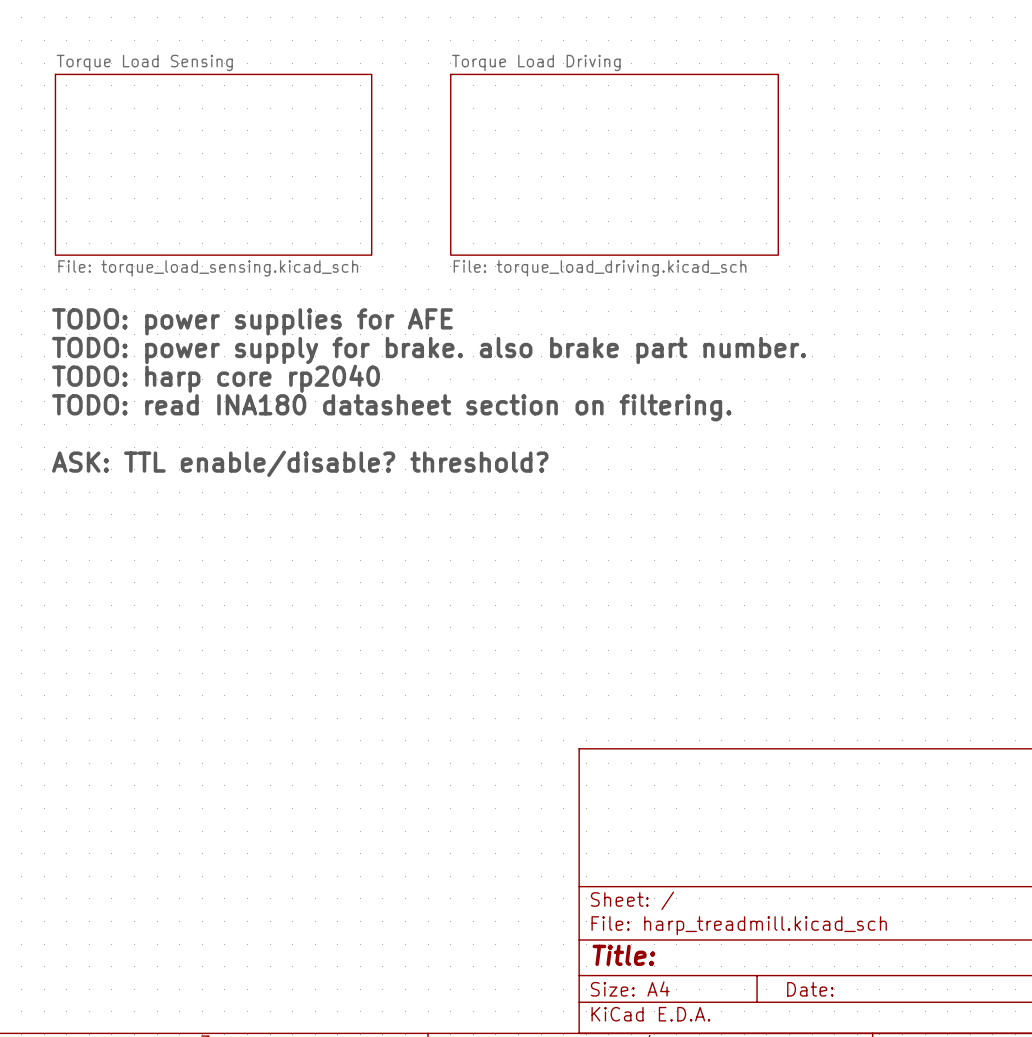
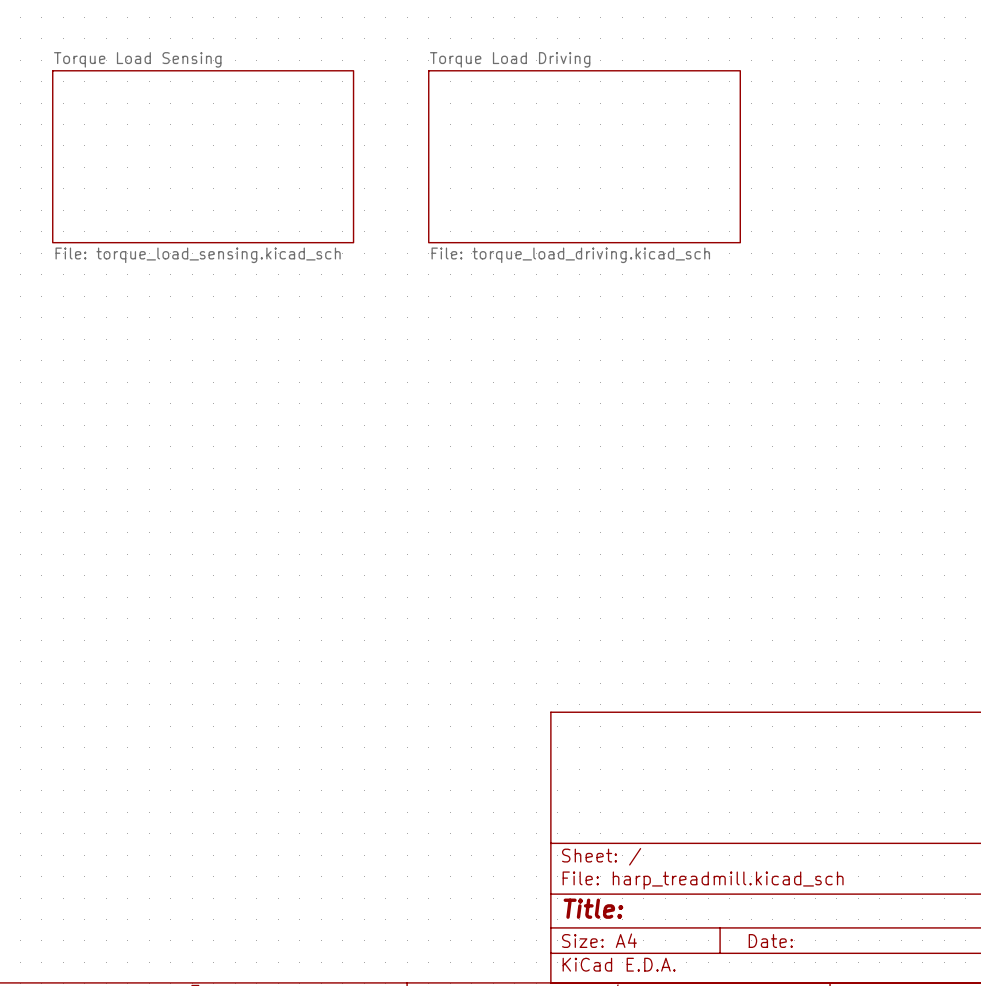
text: TODO: power supplies for AFE (252, 321) -> none
text: TODO: power supply for brake. also brake part number. (429, 350) -> none
text: TODO: harp core rp2040 (216, 378) -> none
text: TODO: read INA180 datasheet section on filtering. (391, 407) -> none
text: ASK: TTL enable/disable? threshold? (300, 463) -> none

